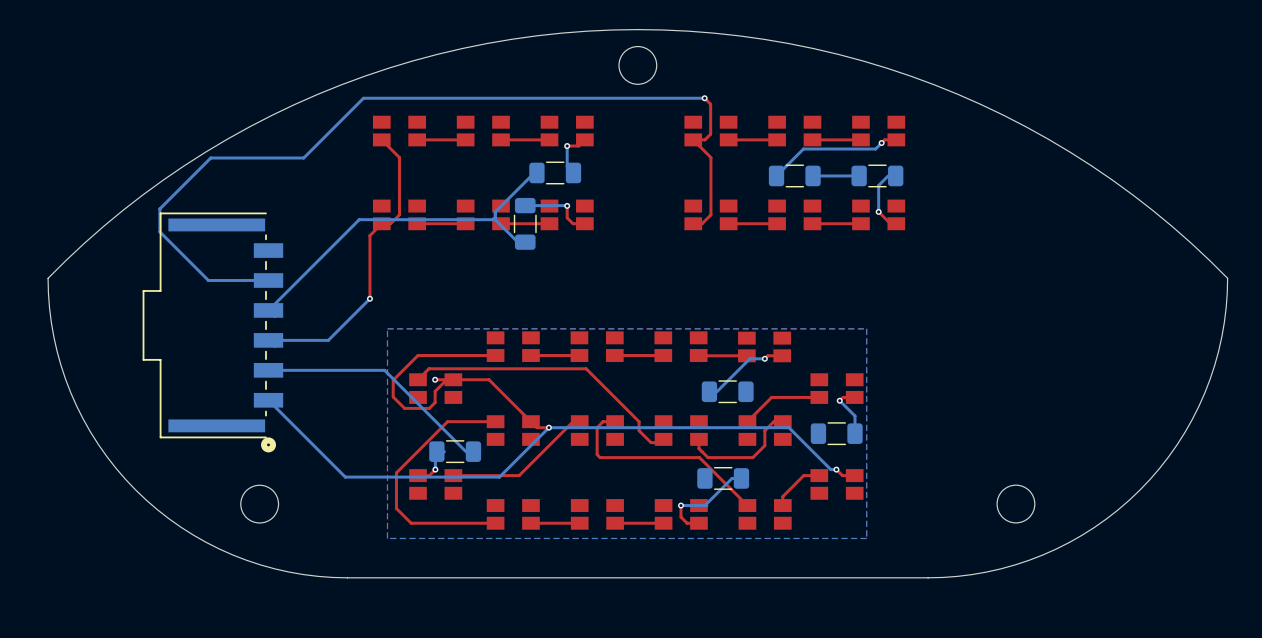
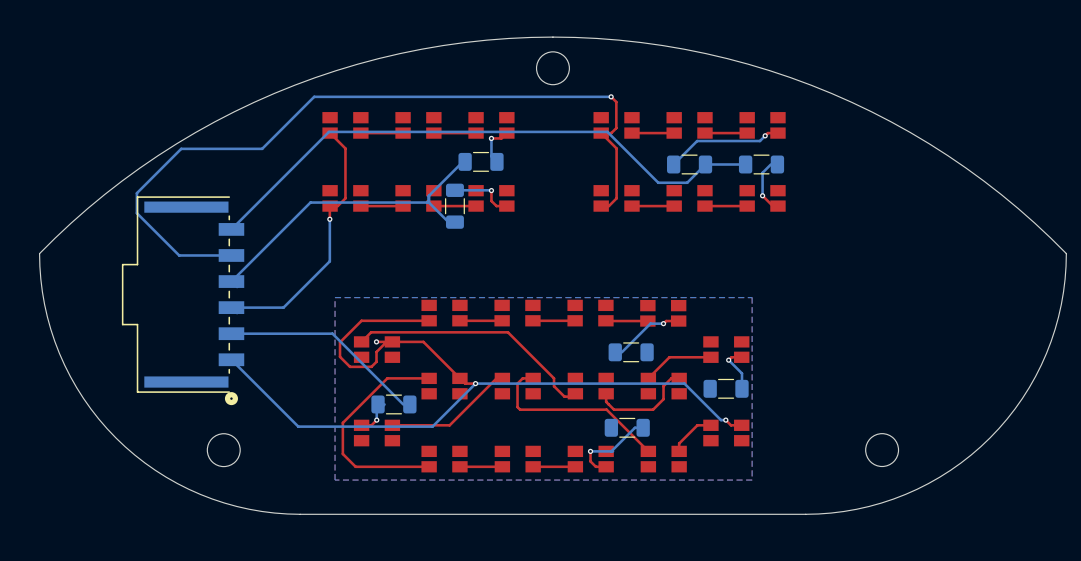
bottom track: none -> (705, 164) (687, 182) (658, 182) (607, 131) (328, 131) (231, 229)
top track: (381, 224) (369, 235) (369, 298) -> (329, 206) (329, 219)
bottom track: none -> (329, 219) (329, 261) (319, 271)
via position: (369, 298) -> (329, 219)

